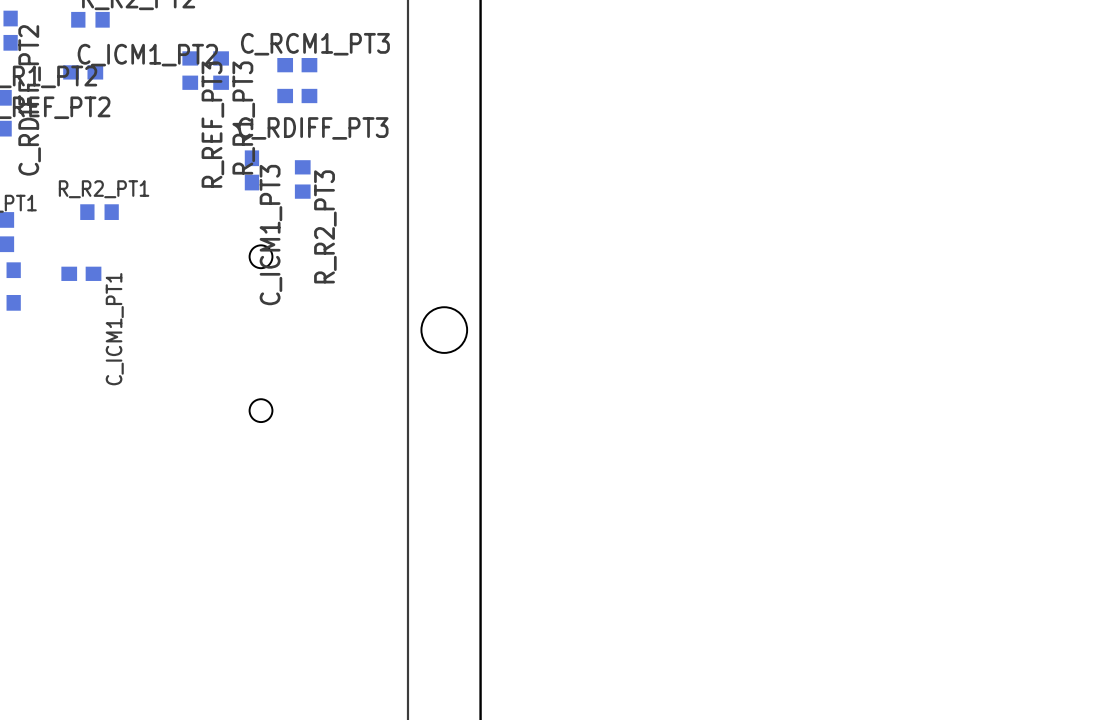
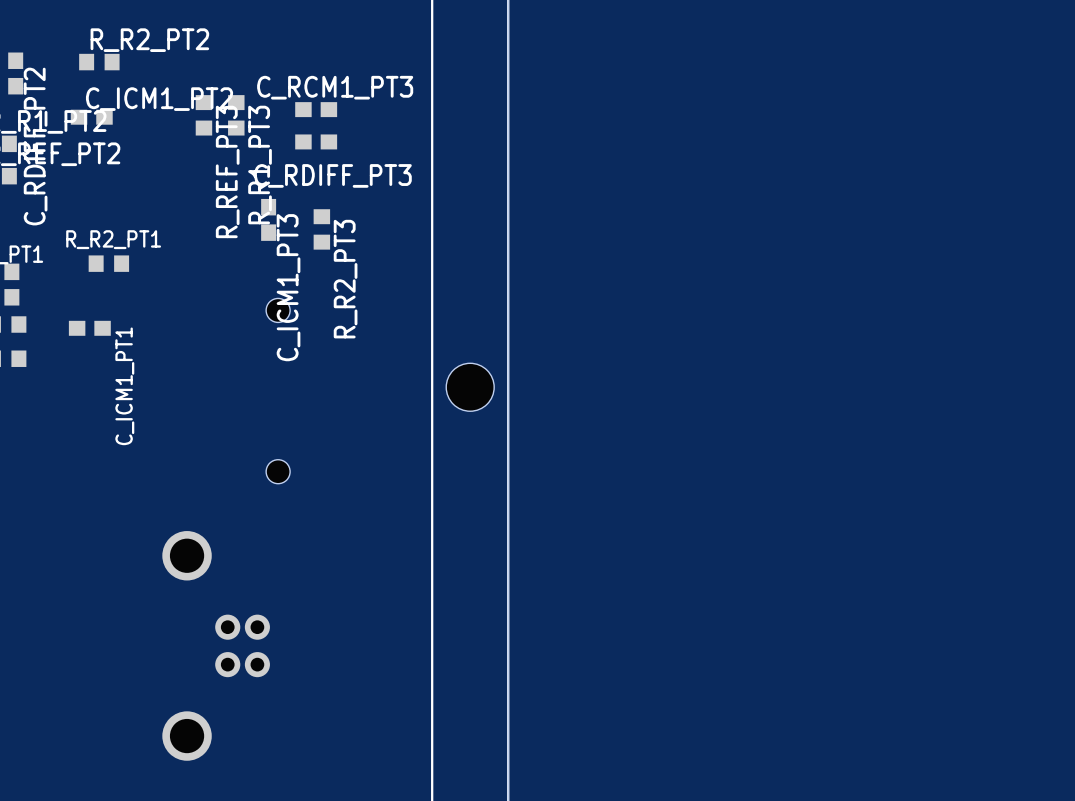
part: none -> (216, 645)

